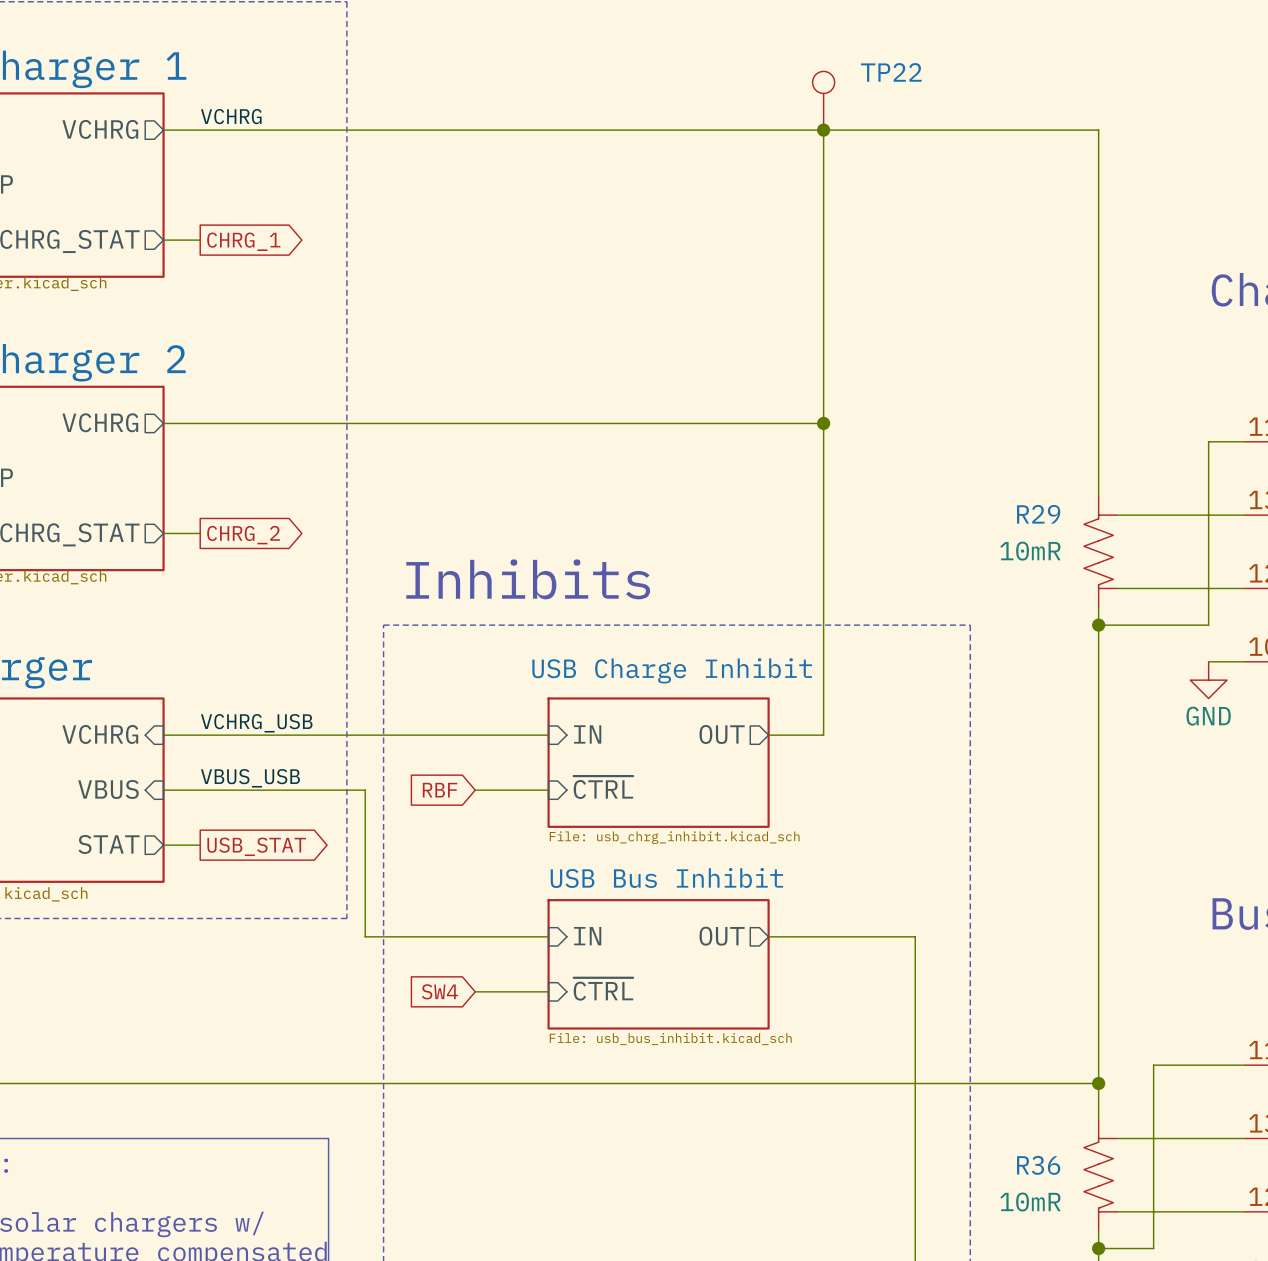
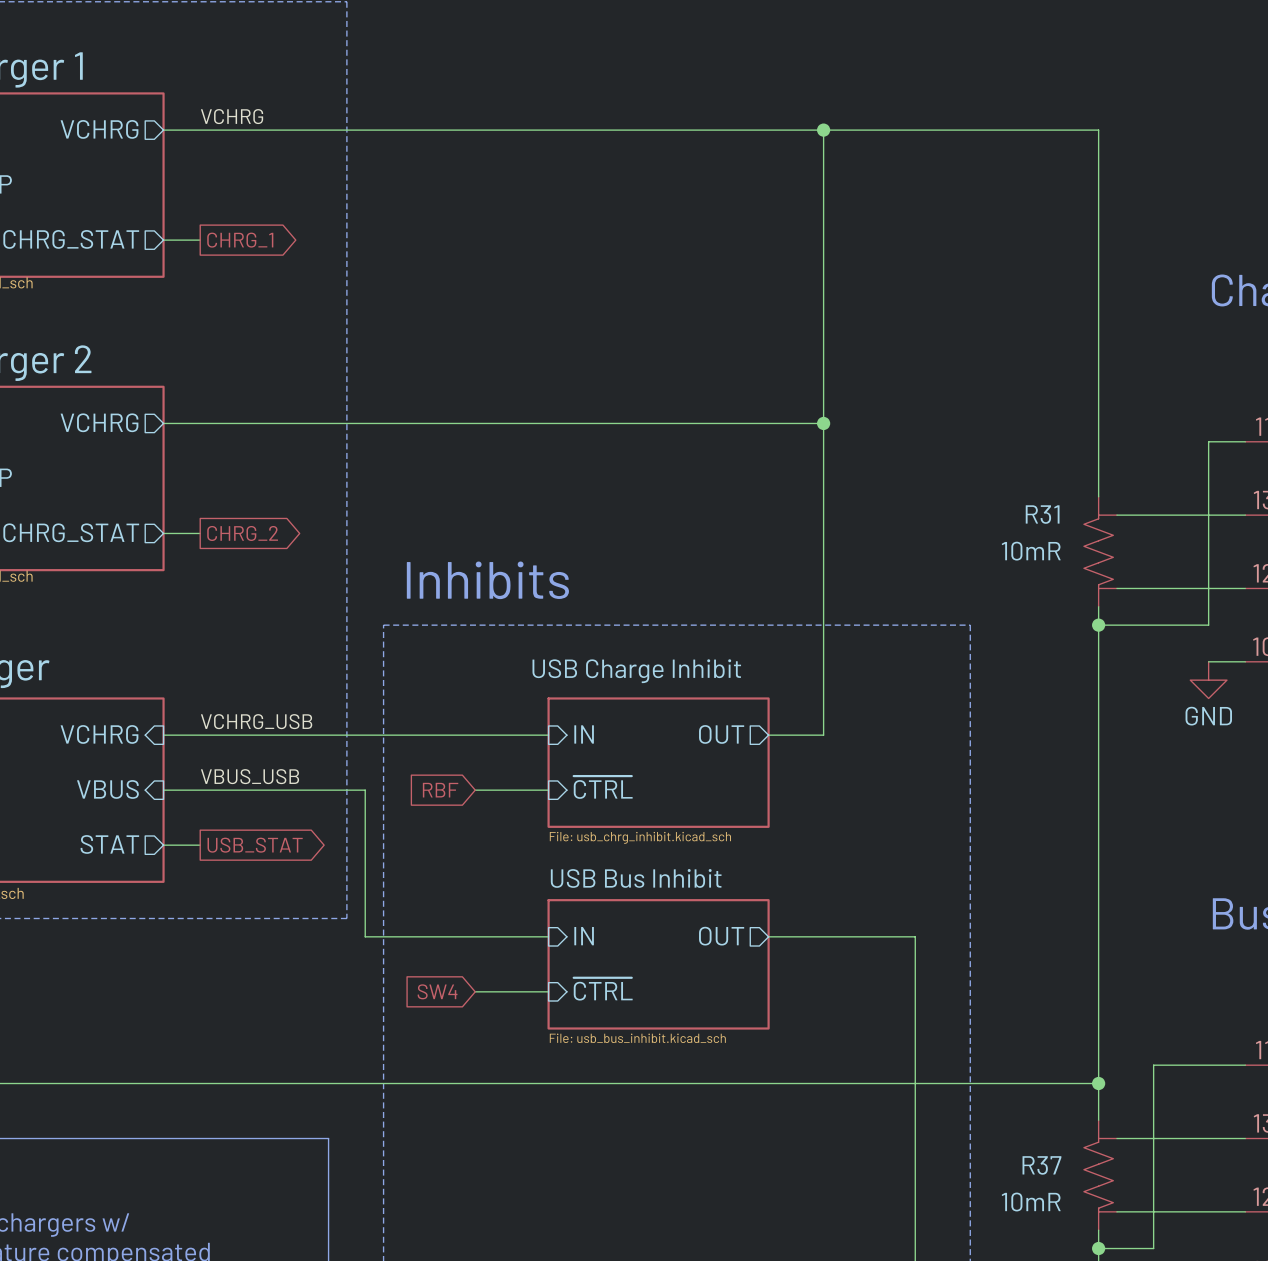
TP22: (823, 100) -> none
R29 name: R29 (1038, 514) -> R31 (1042, 514)
R36 name: R36 (1038, 1165) -> R37 (1041, 1165)

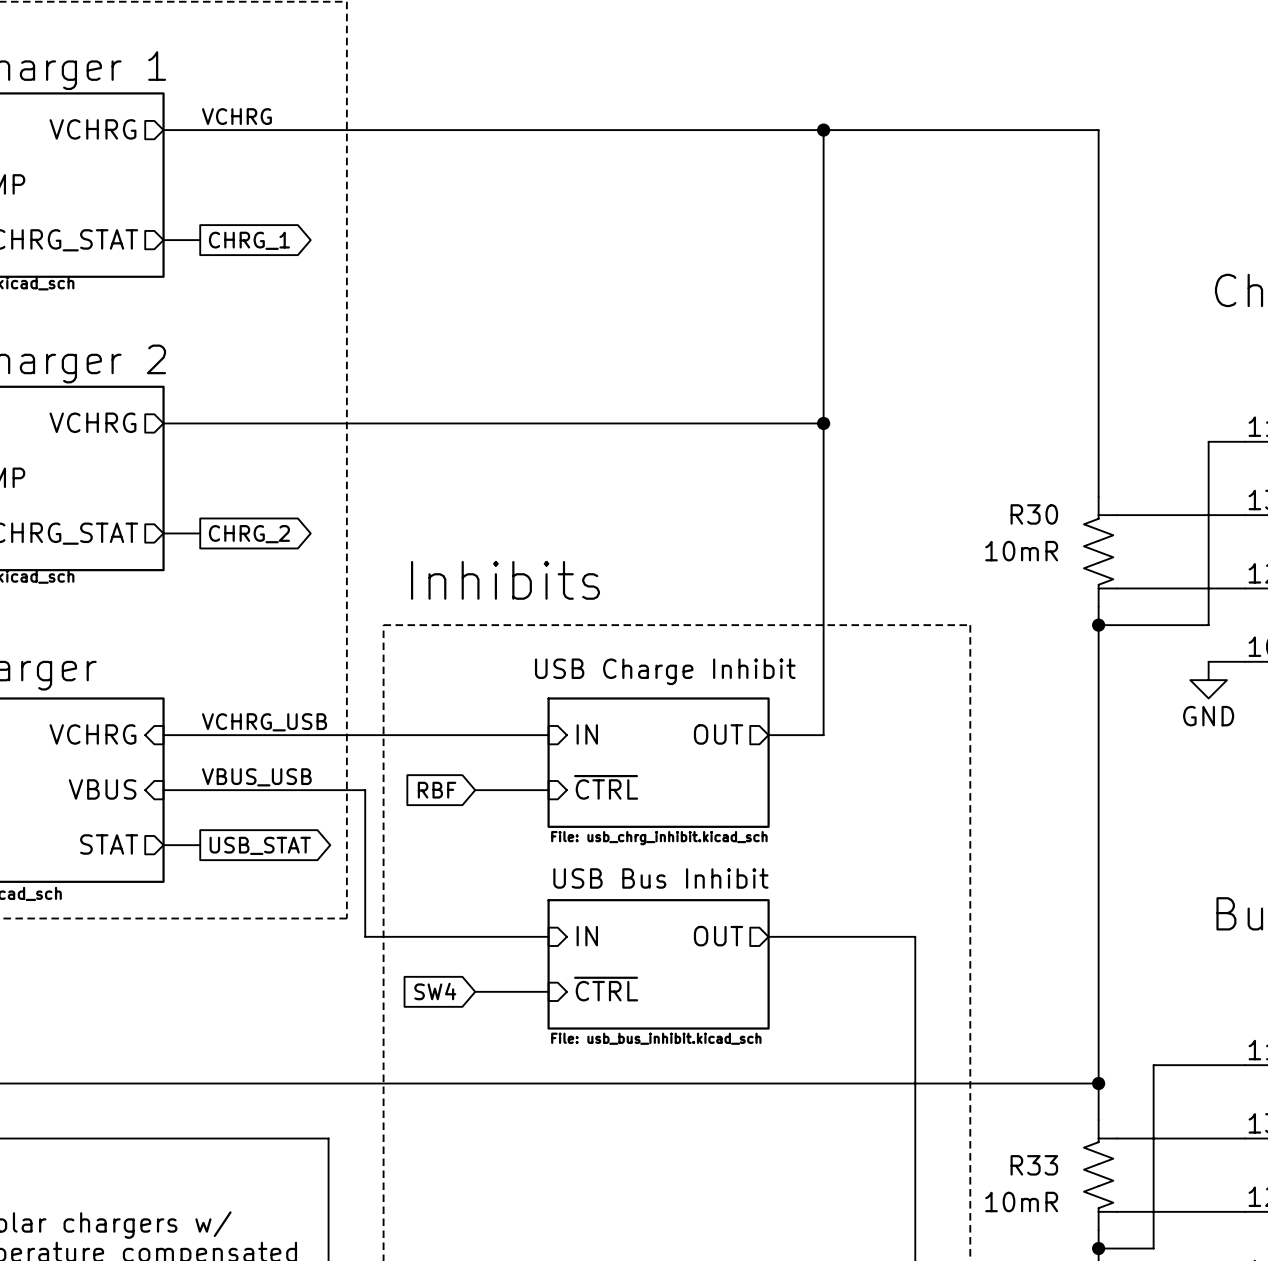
R31 name: R31 (1042, 514) -> R30 (1034, 514)
R37 name: R37 (1041, 1165) -> R33 (1034, 1165)

